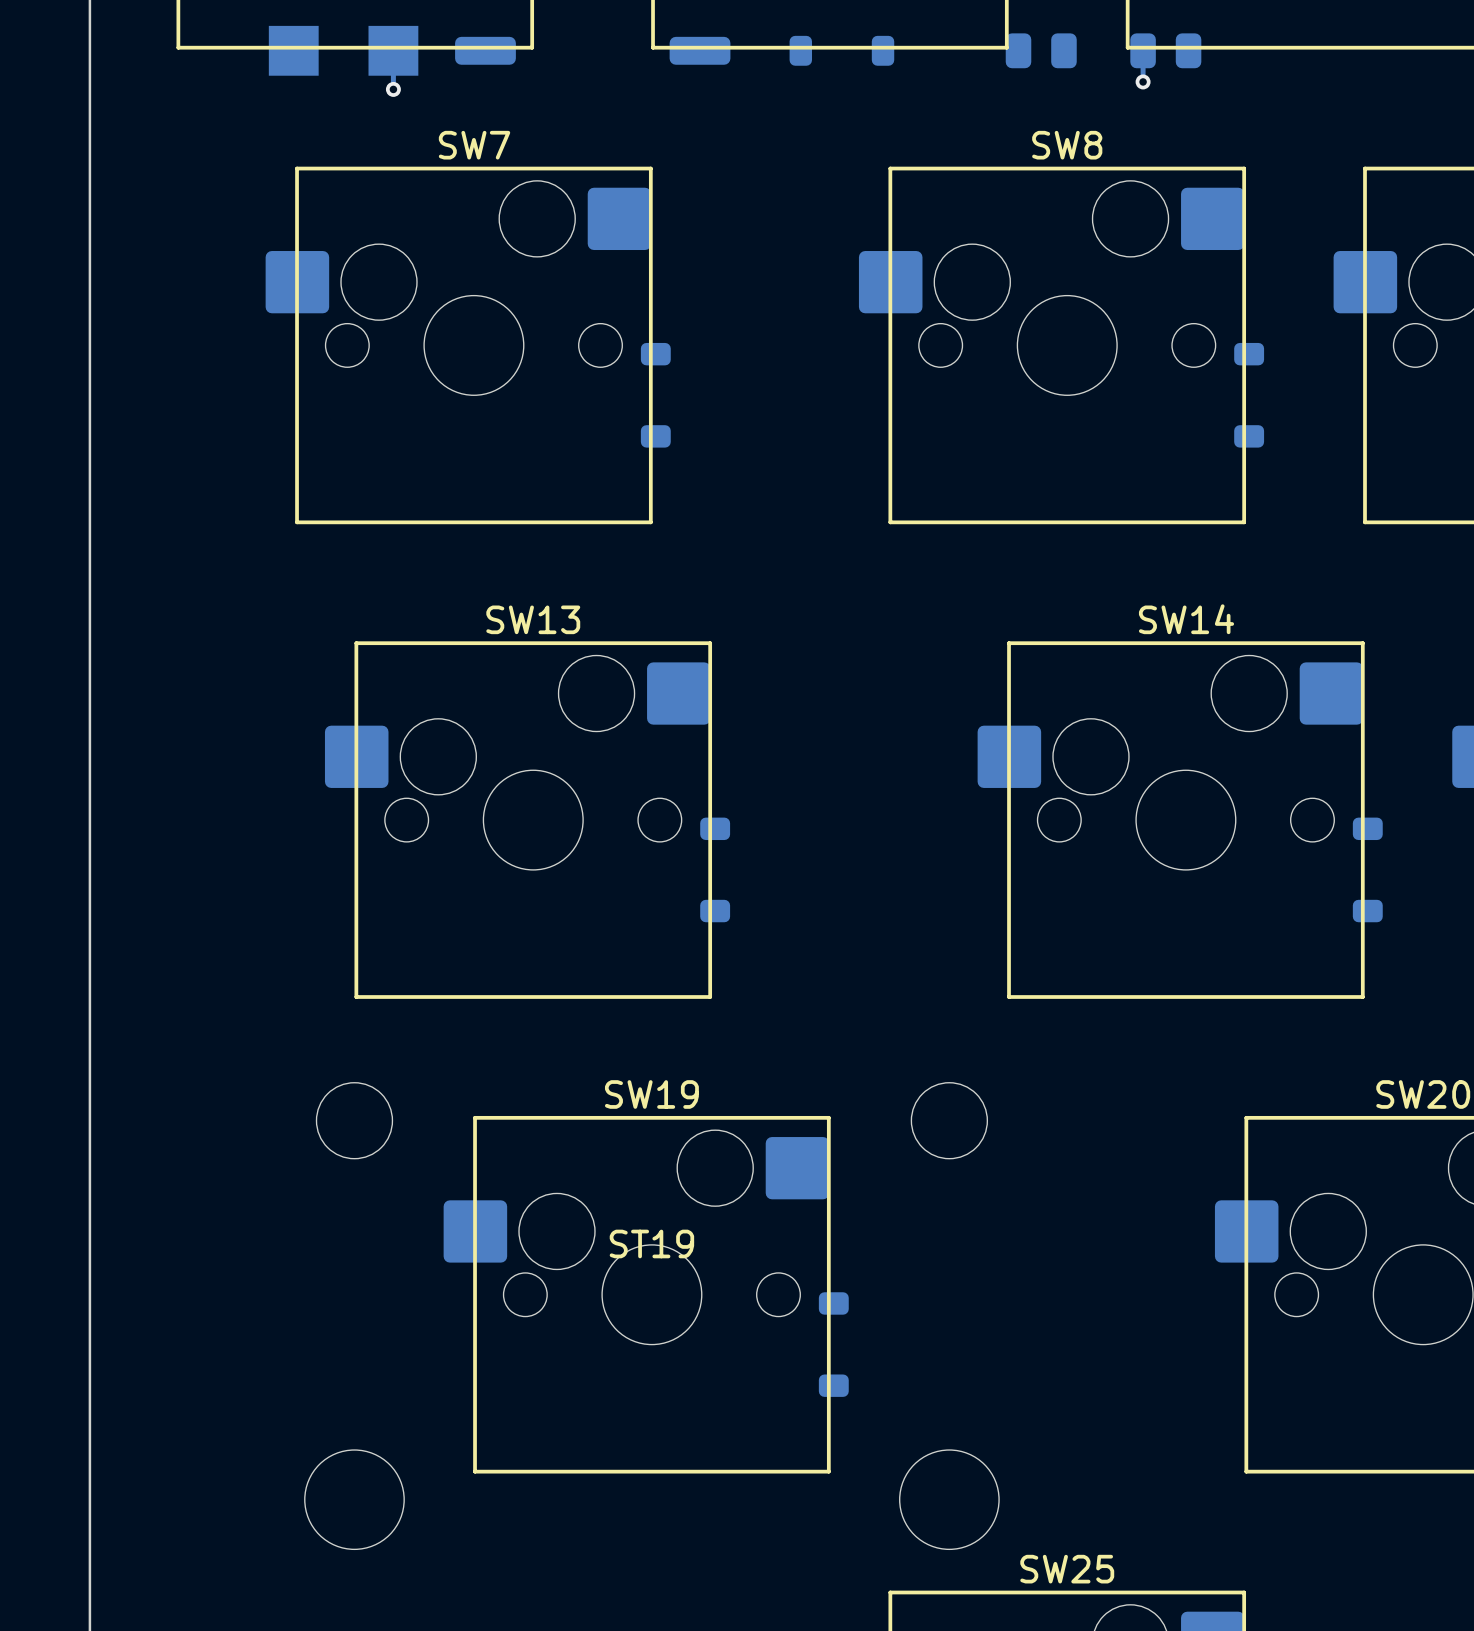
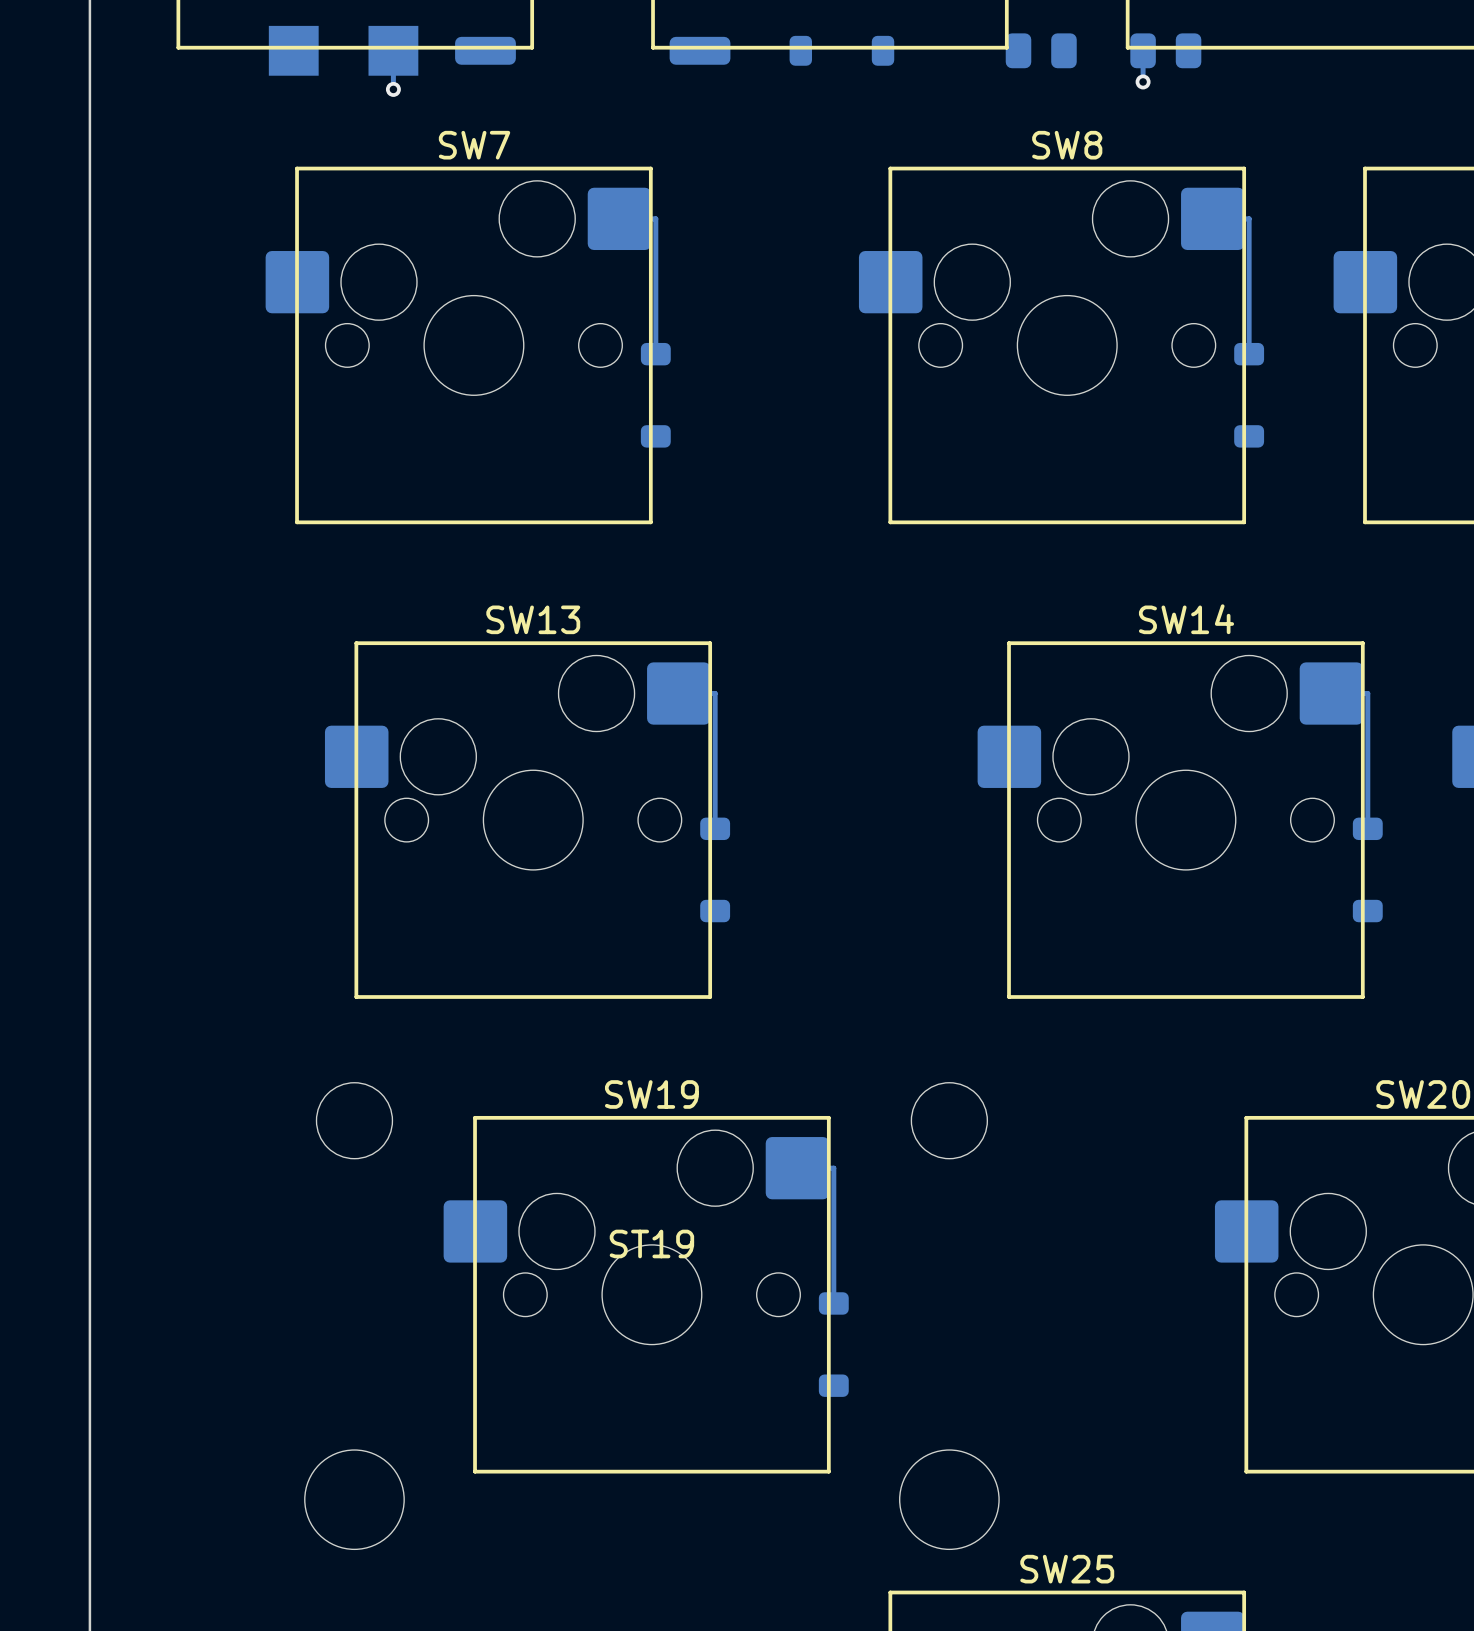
bottom track: none -> (619, 218) (655, 218) (655, 354)
bottom track: none -> (1212, 218) (1249, 218) (1249, 354)
bottom track: none -> (678, 693) (715, 693) (715, 828)
bottom track: none -> (1331, 693) (1367, 693) (1367, 828)
bottom track: none -> (797, 1168) (833, 1168) (833, 1303)

